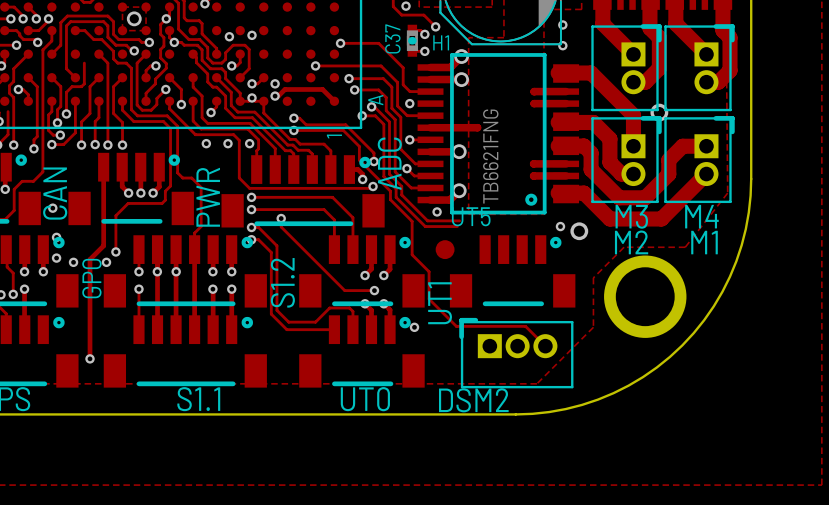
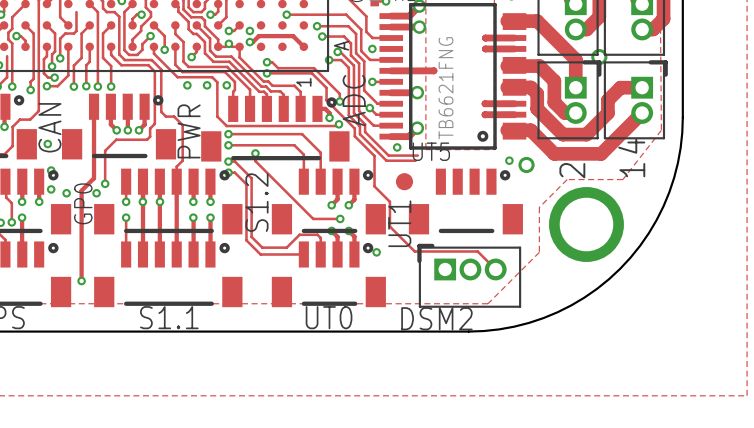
text: none -> 4 (631, 146)
M3 name: M3 (631, 216) -> none
M4 name: M4 (701, 216) -> none
text: none -> 2 (572, 170)
M2 name: M2 (631, 242) -> none
M1 name: M1 (704, 242) -> none
text: none -> 1 (632, 170)

